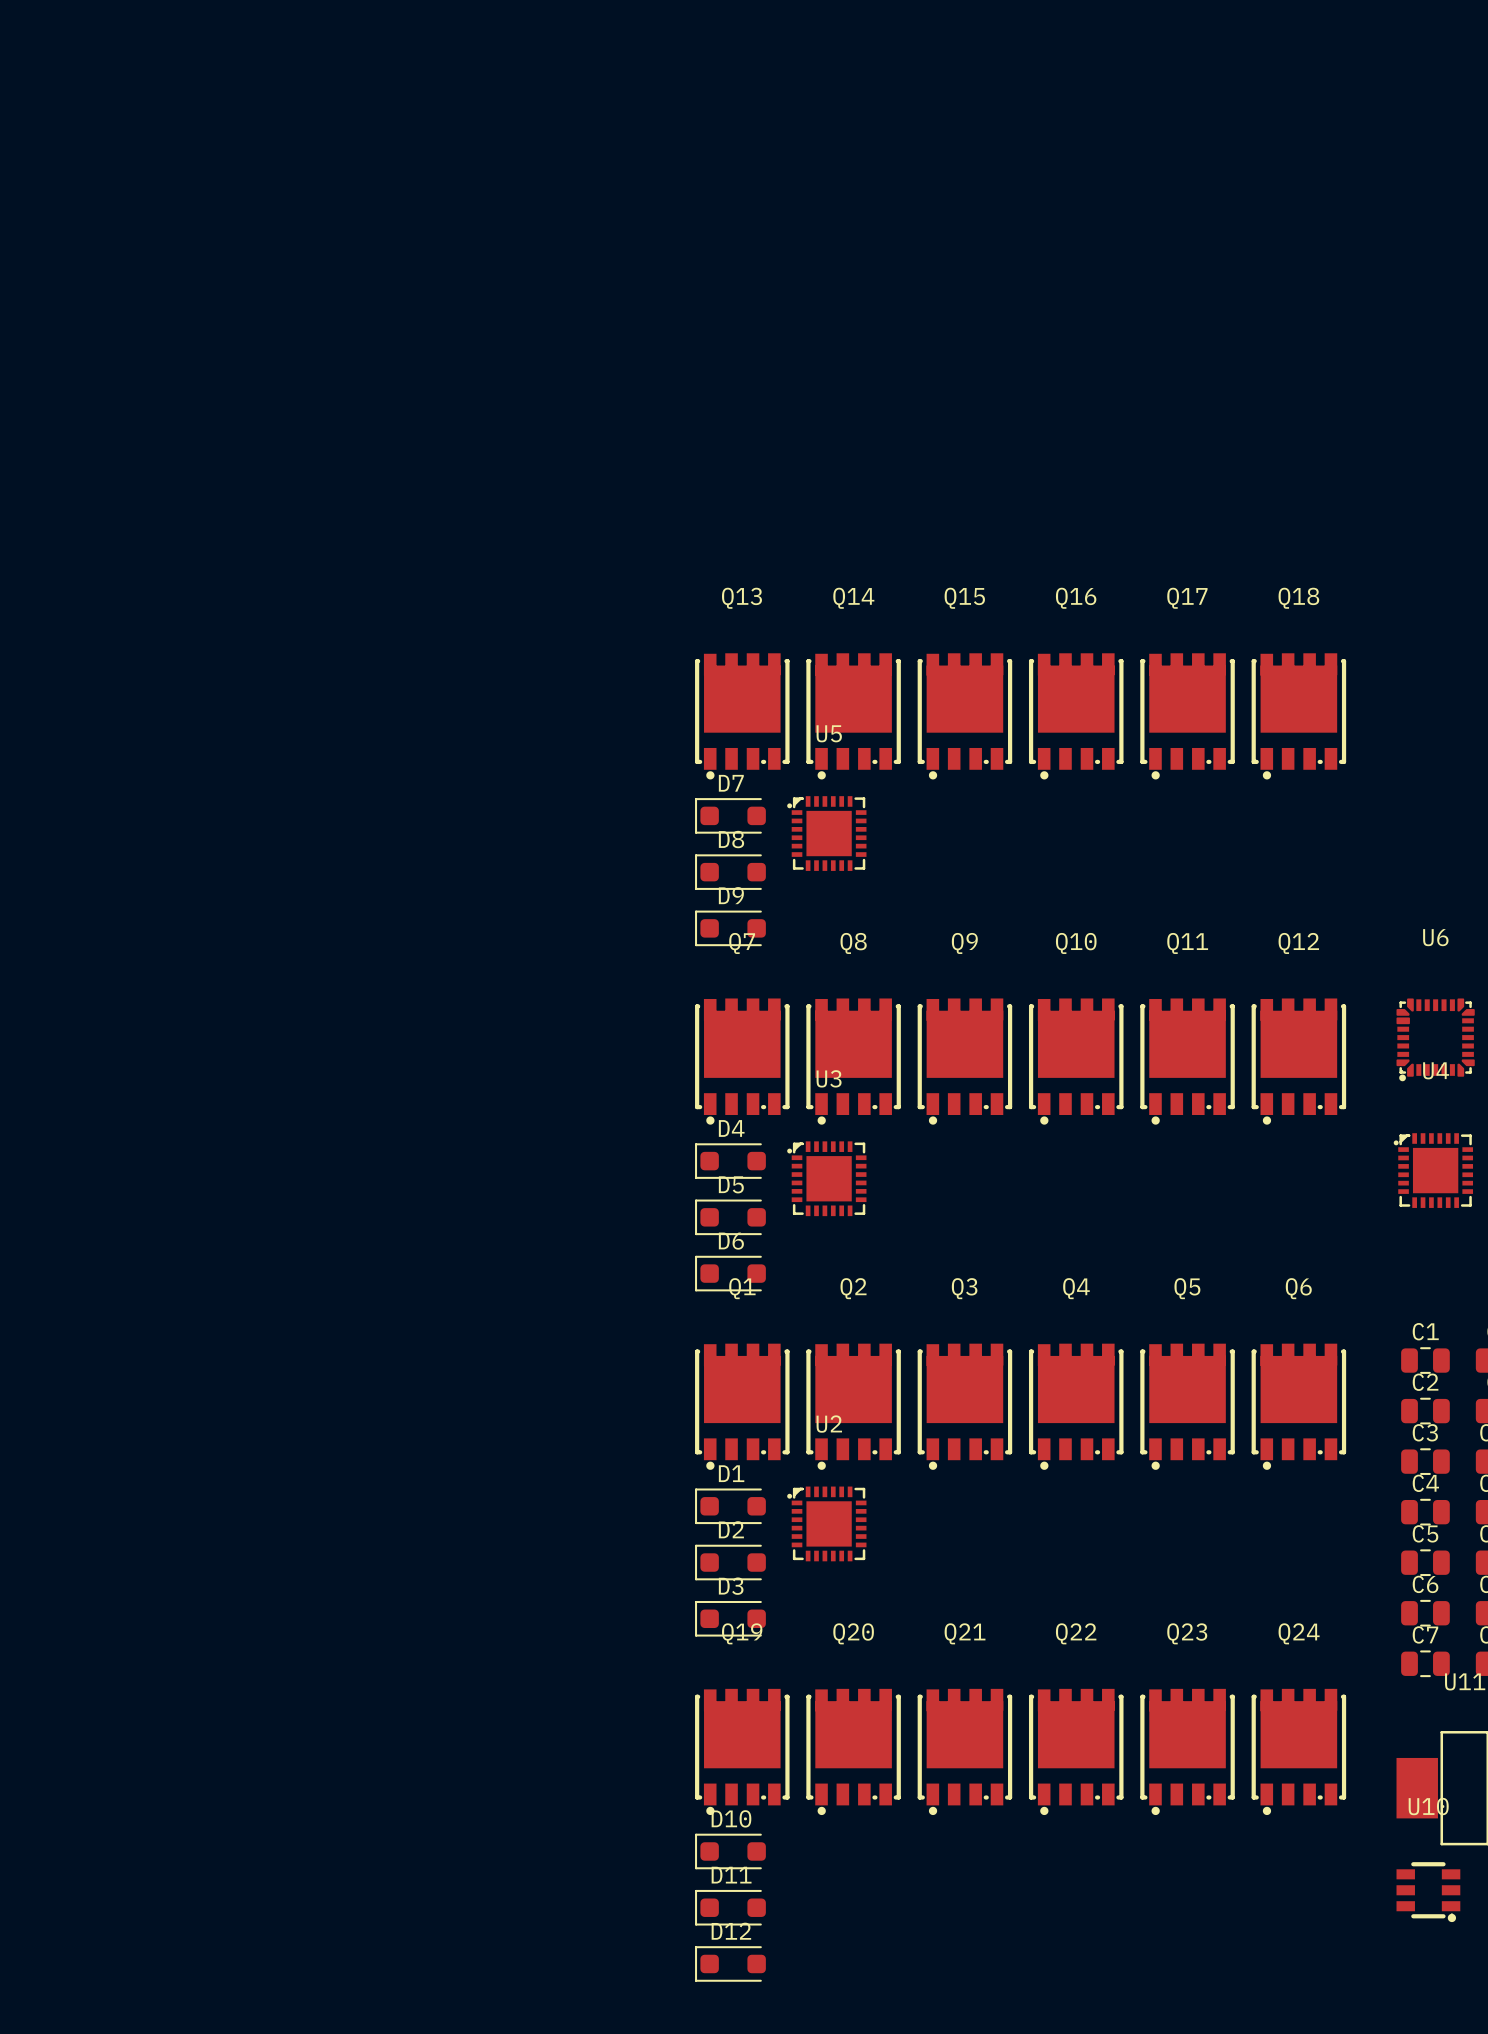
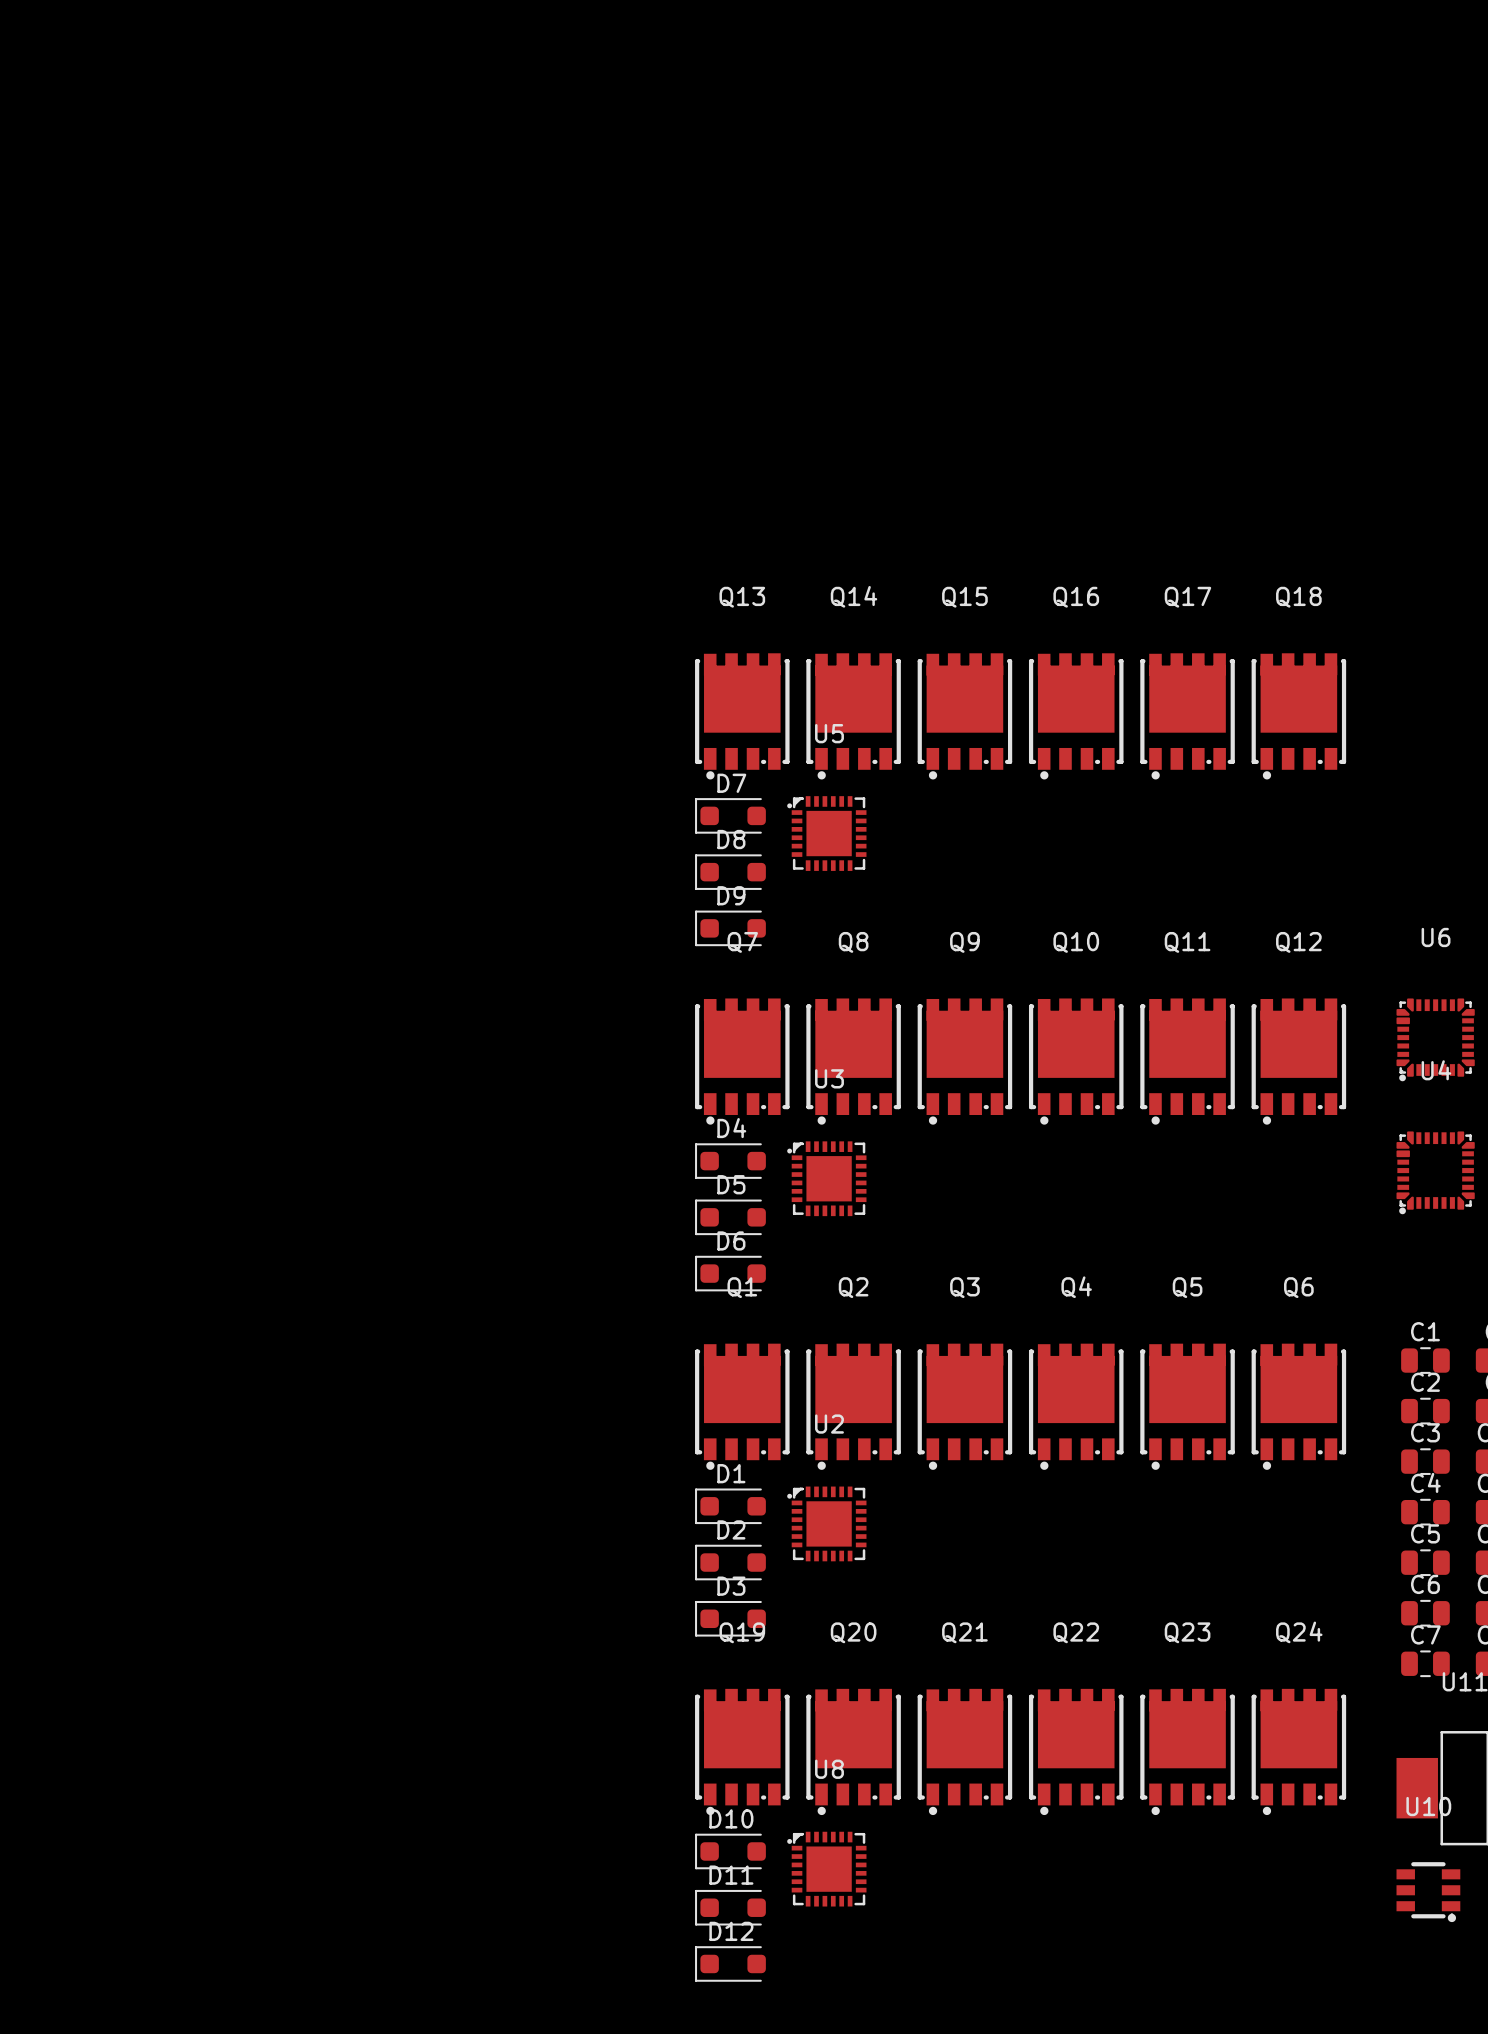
U4 footprint: [1393, 1133, 1474, 1208] -> [1396, 1131, 1475, 1215]
U8: none -> (826, 1869)

